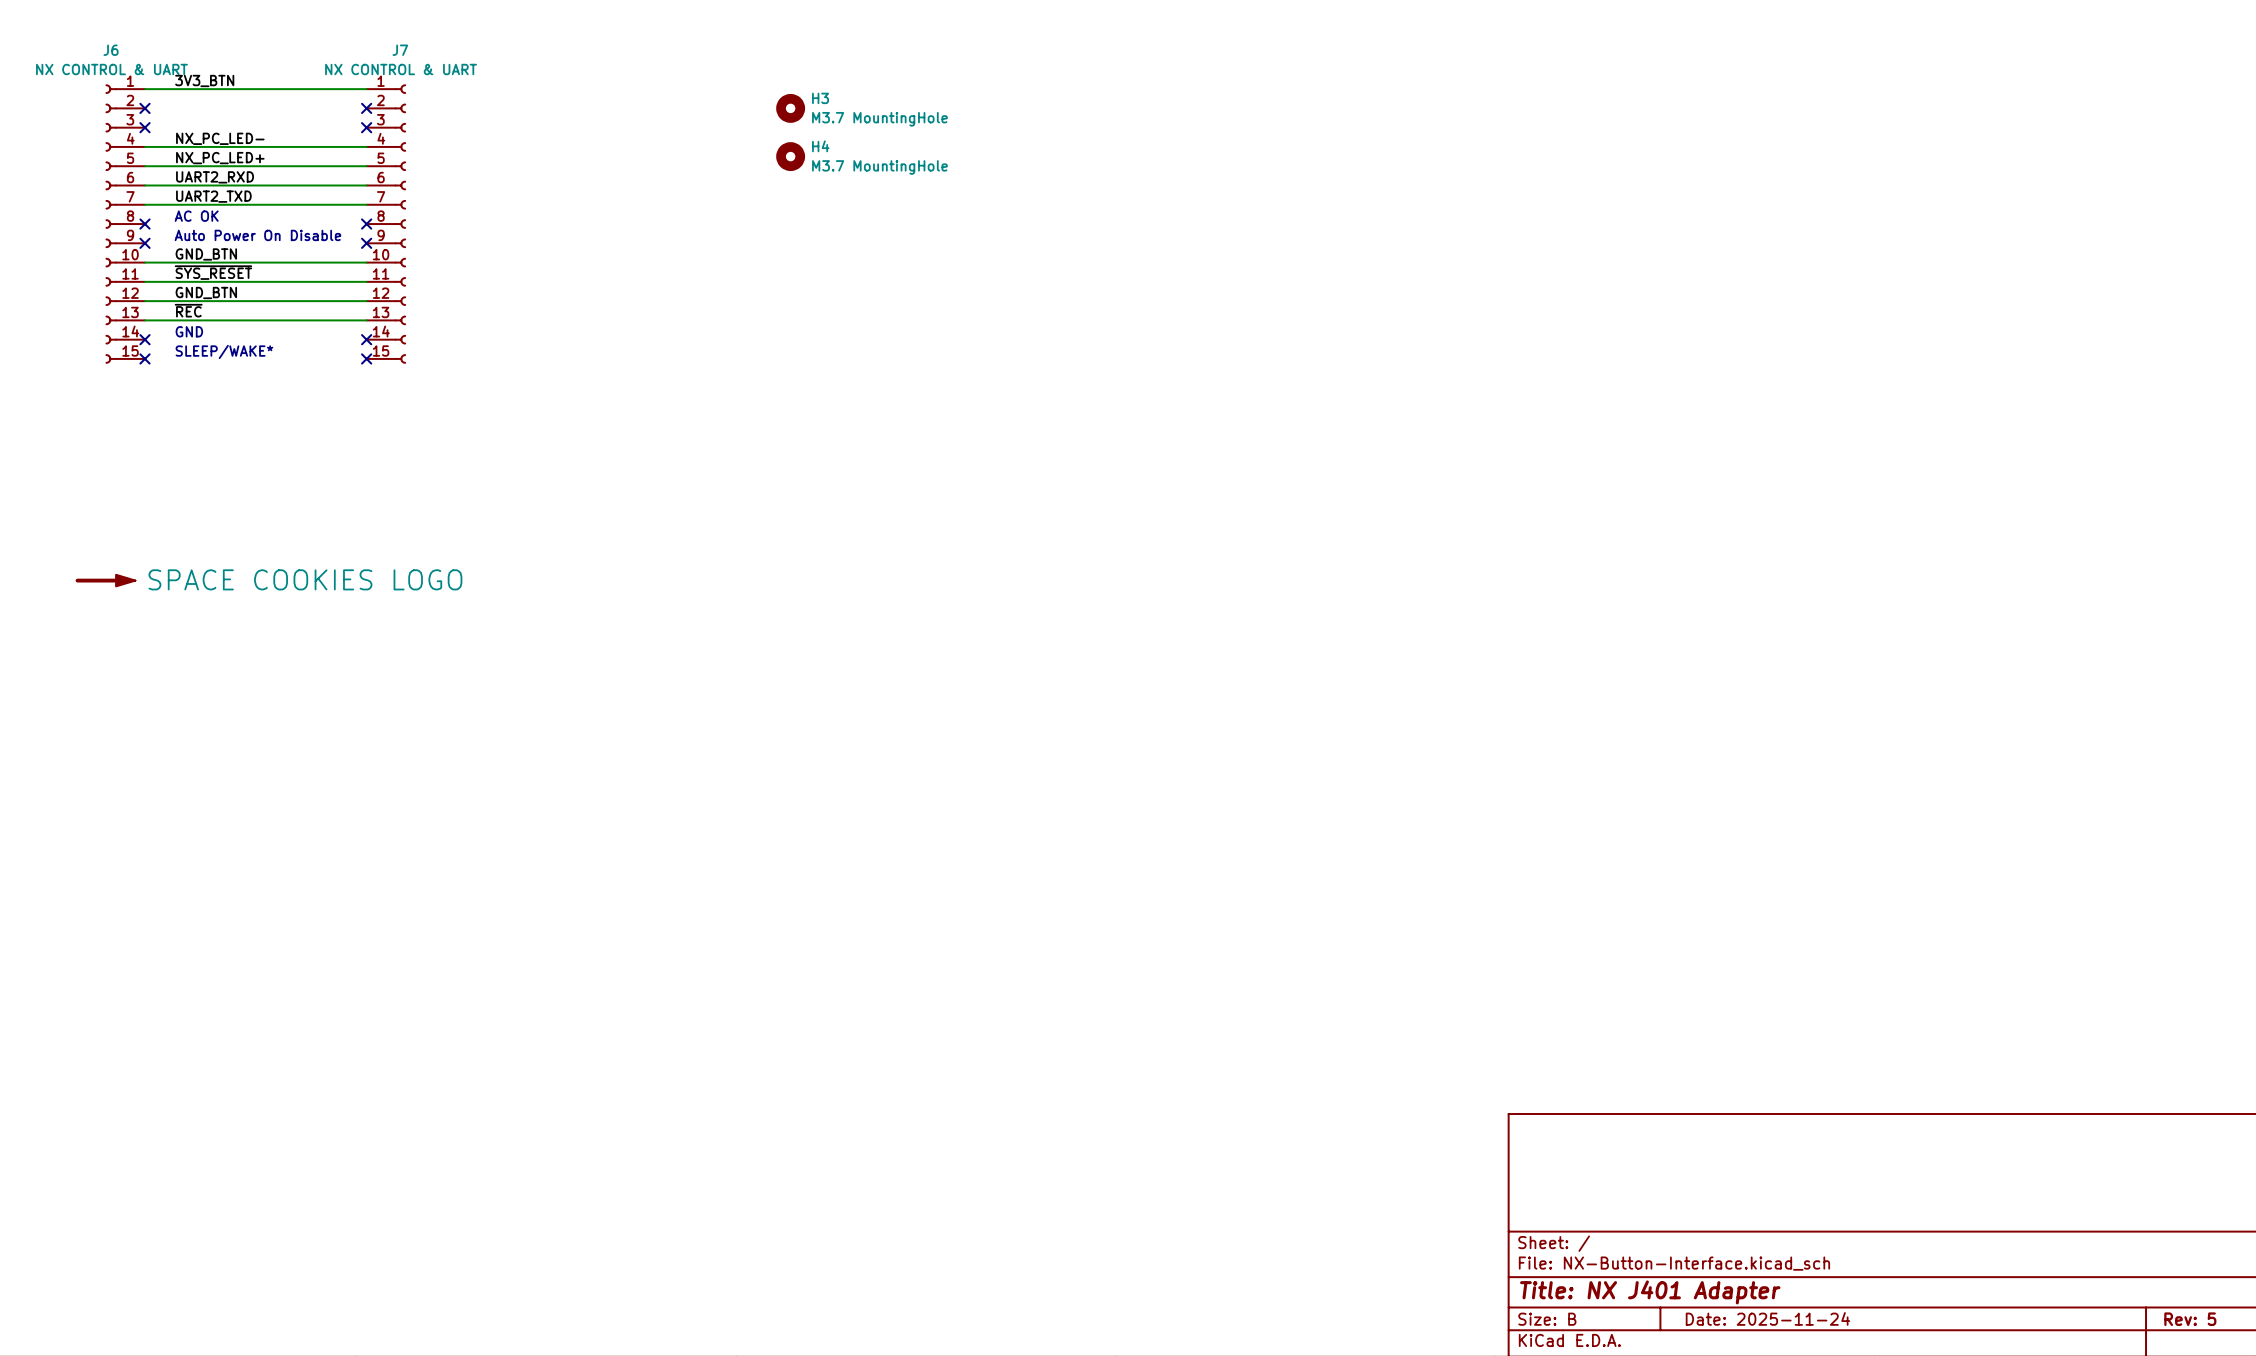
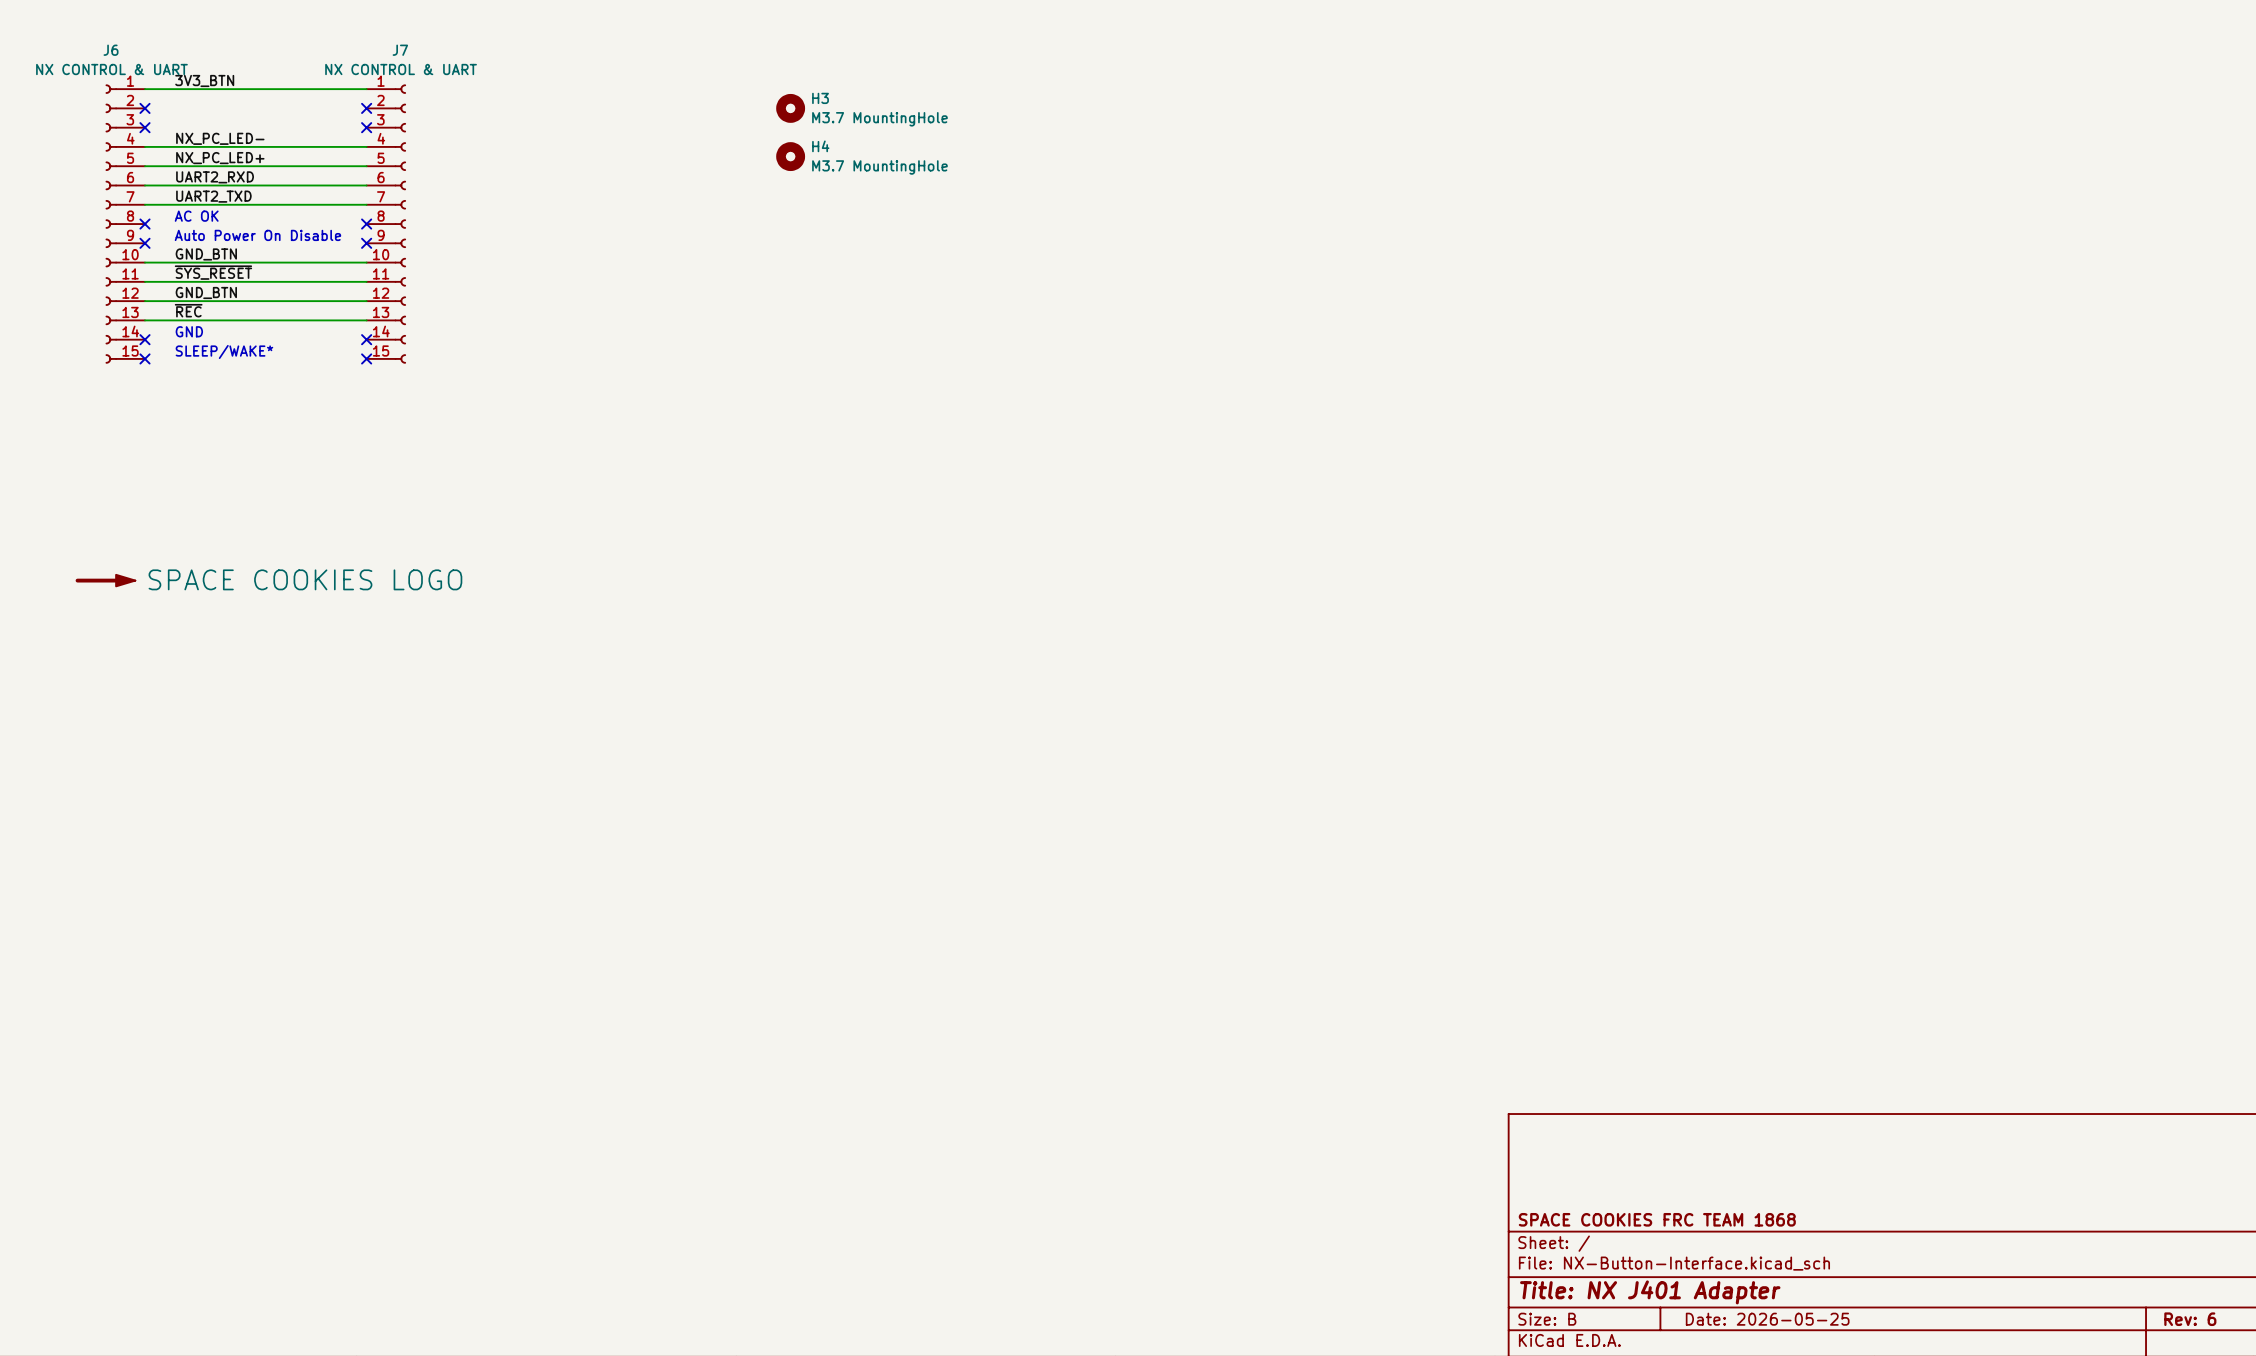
title block: none -> SPACE COOKIES FRC TEAM 1868 (1657, 1219)
title block: Date: 2025-11-24 (1767, 1318) -> Date: 2026-05-25 (1767, 1319)
title block: Rev: 5 (2190, 1319) -> Rev: 6 (2190, 1319)

